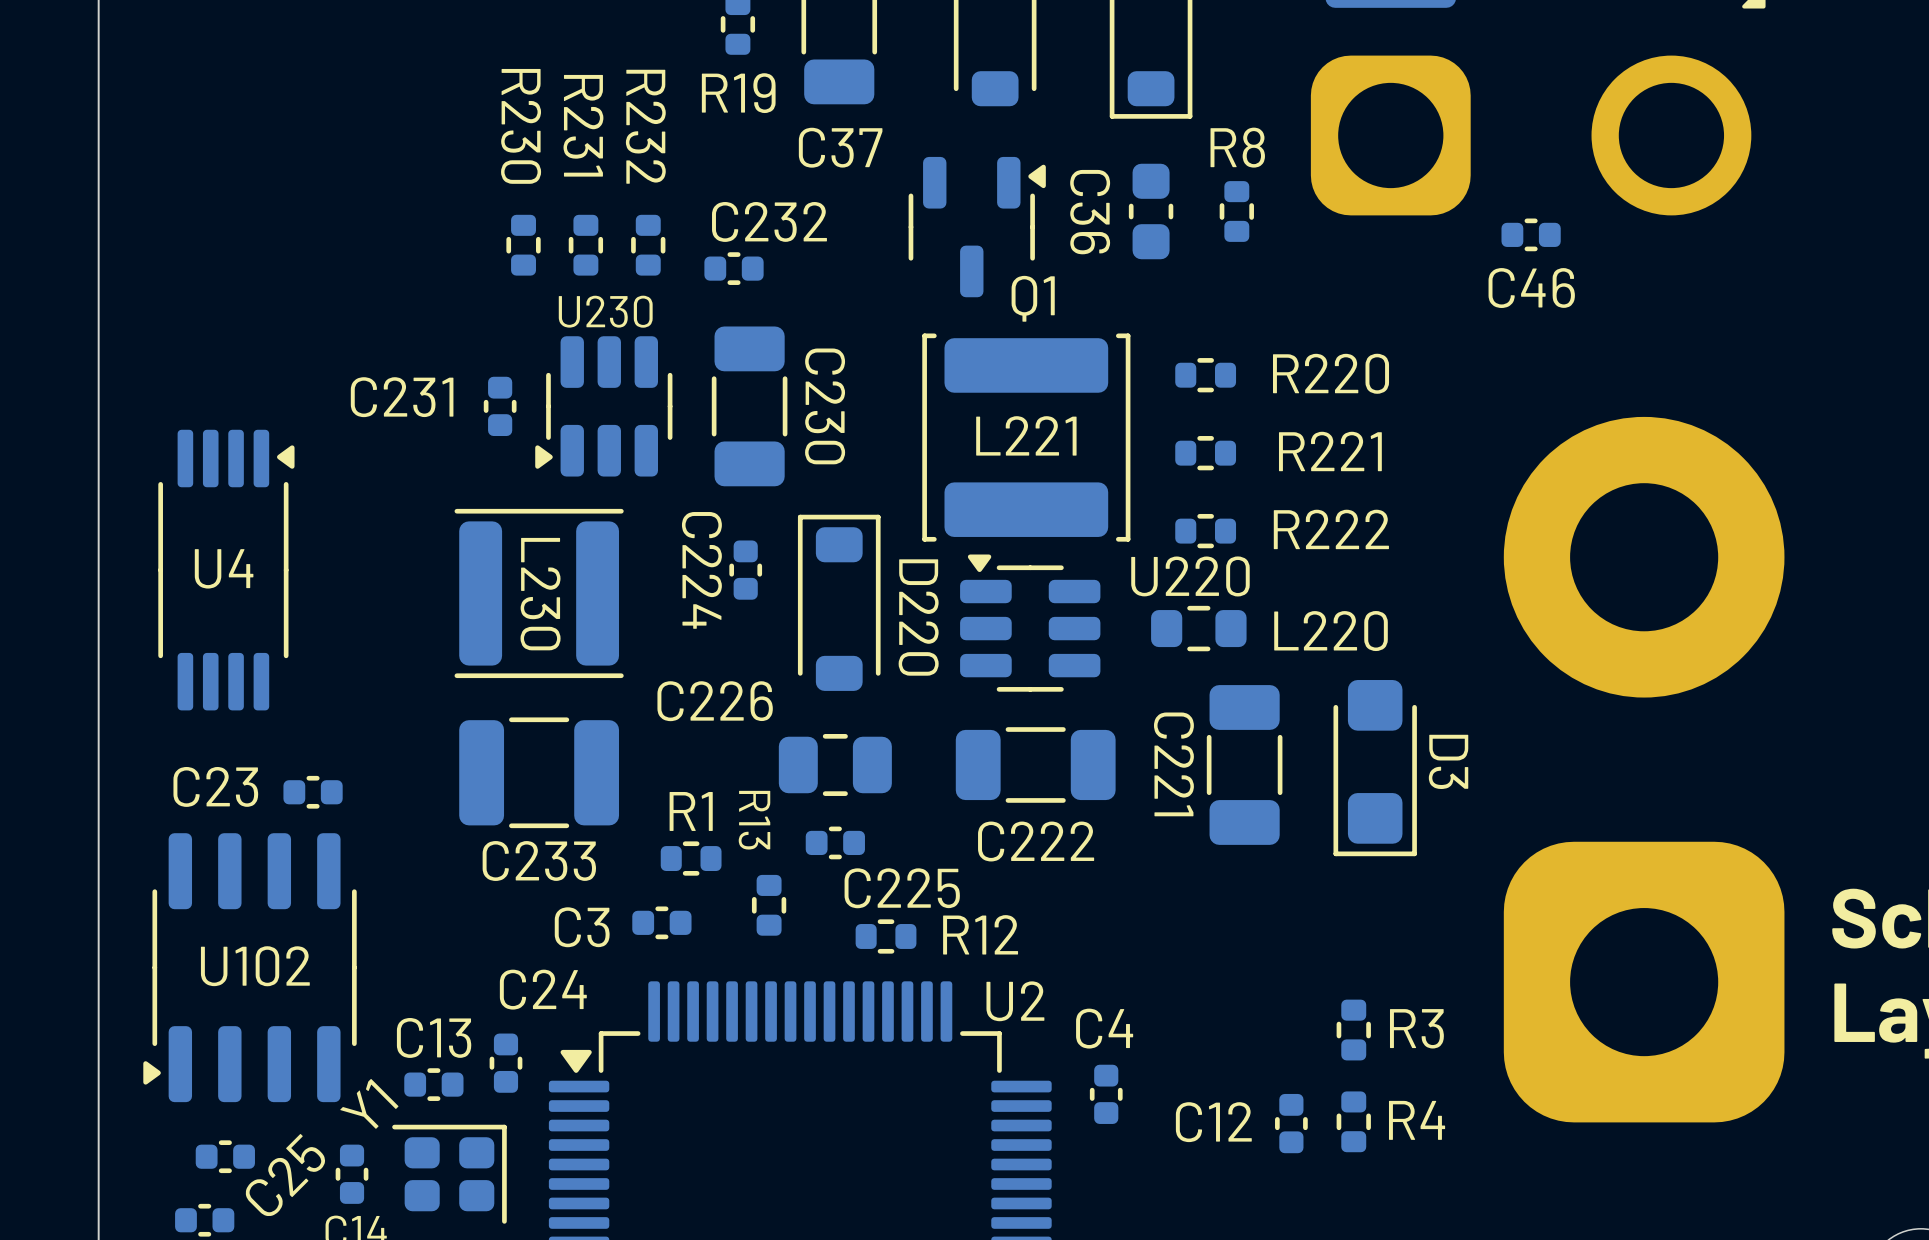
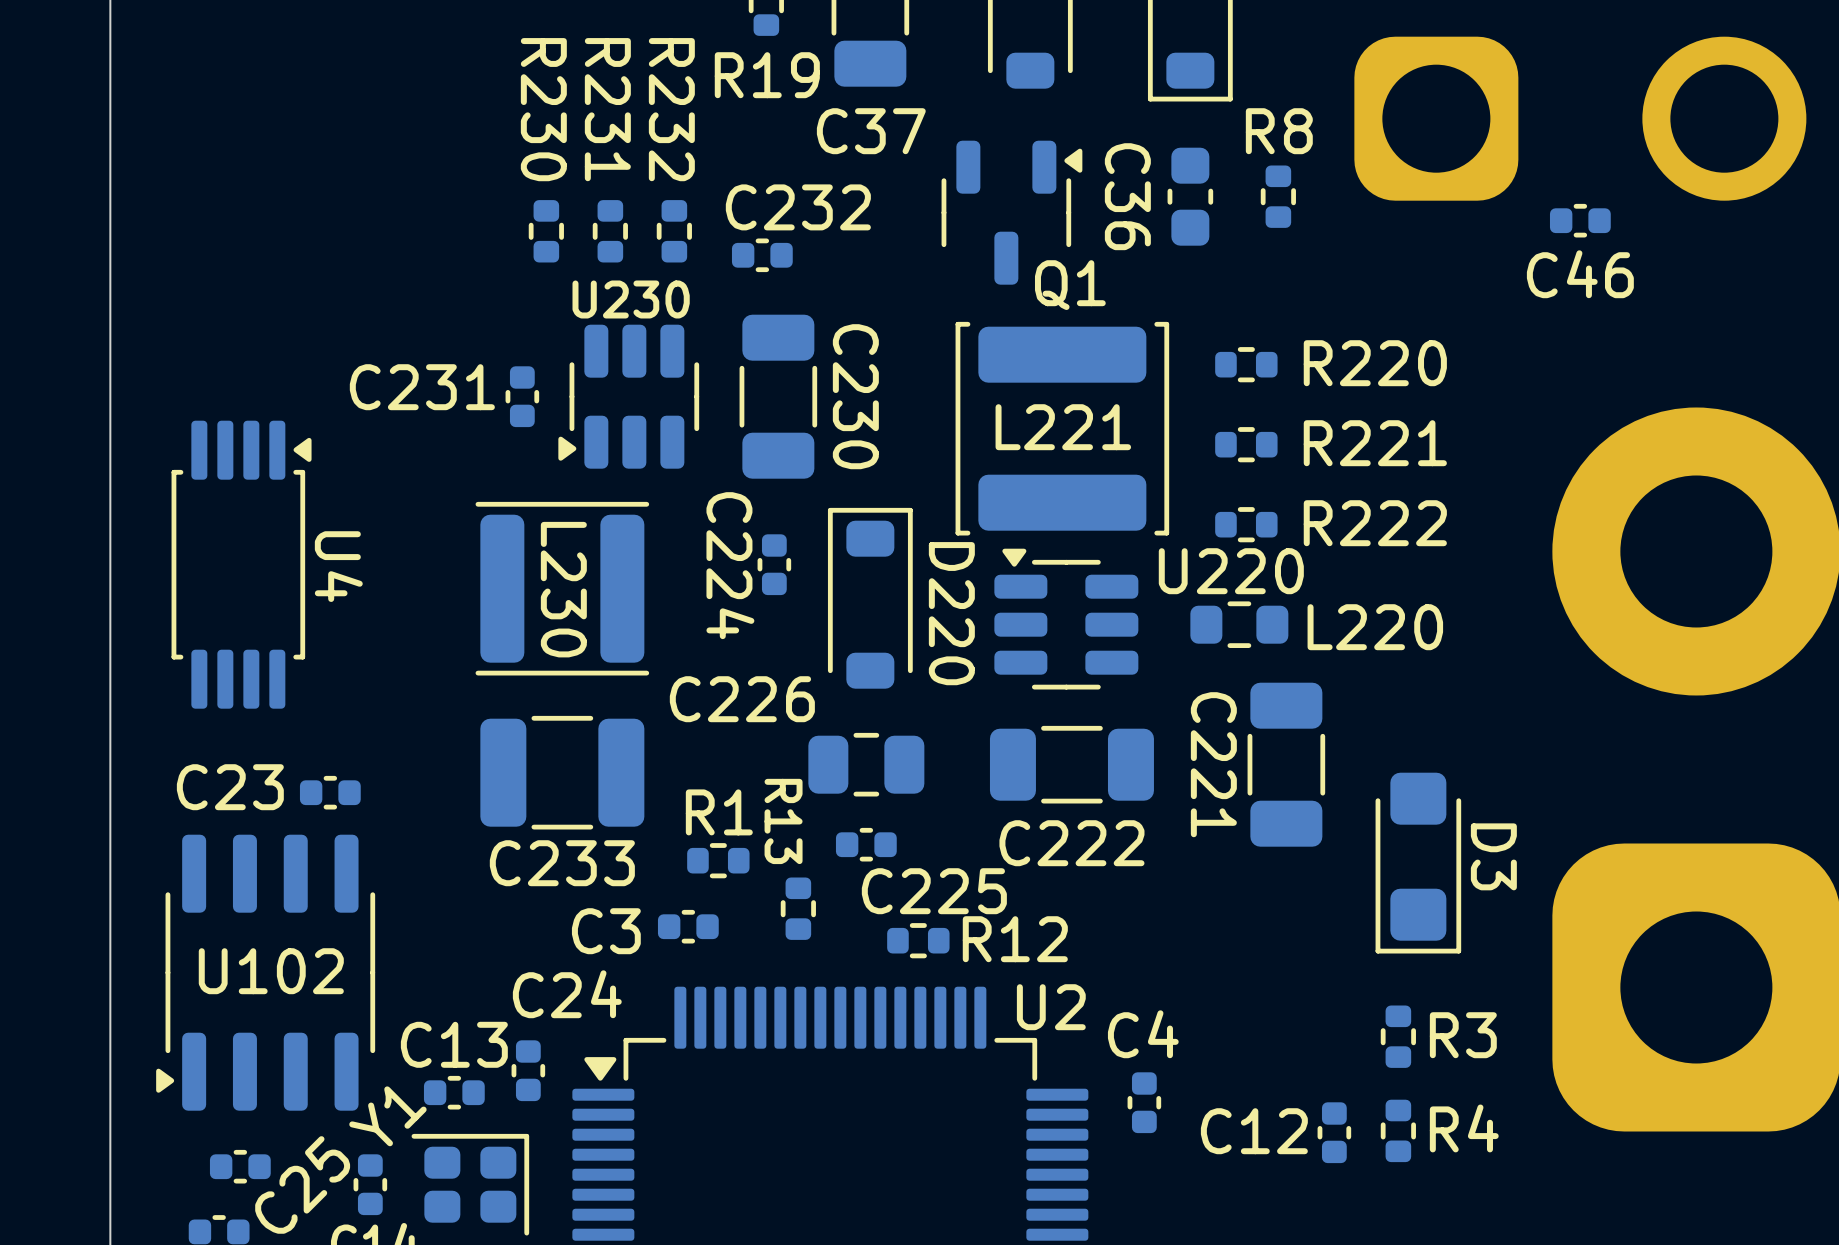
U4 footprint: [158, 429, 295, 711] -> [171, 420, 312, 709]
U4 name rotation: 0° (224, 568) -> 90° clockwise (338, 566)
D3 position: (1375, 768) -> (1418, 863)

